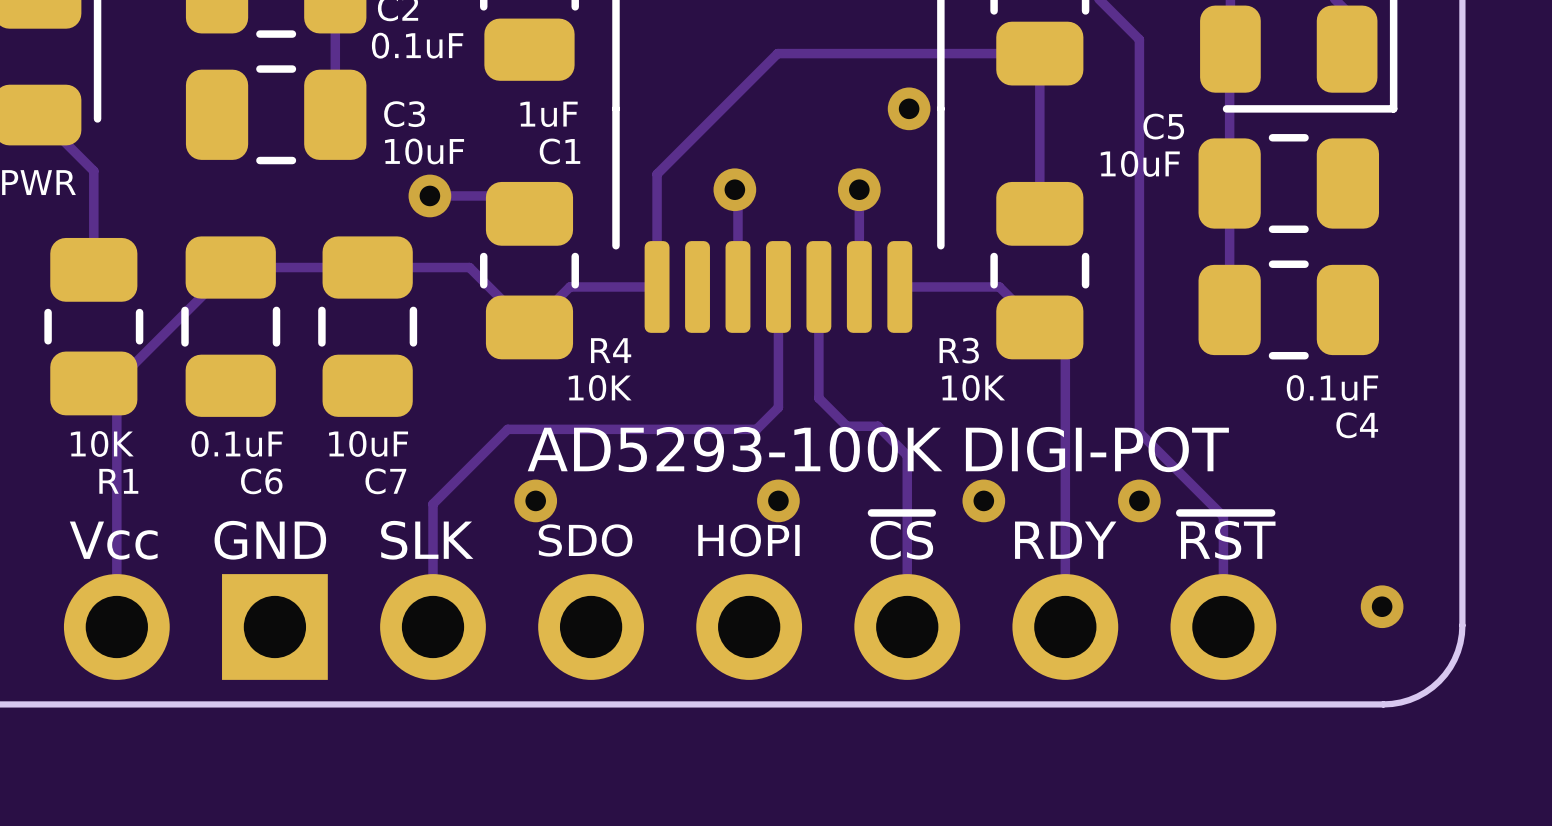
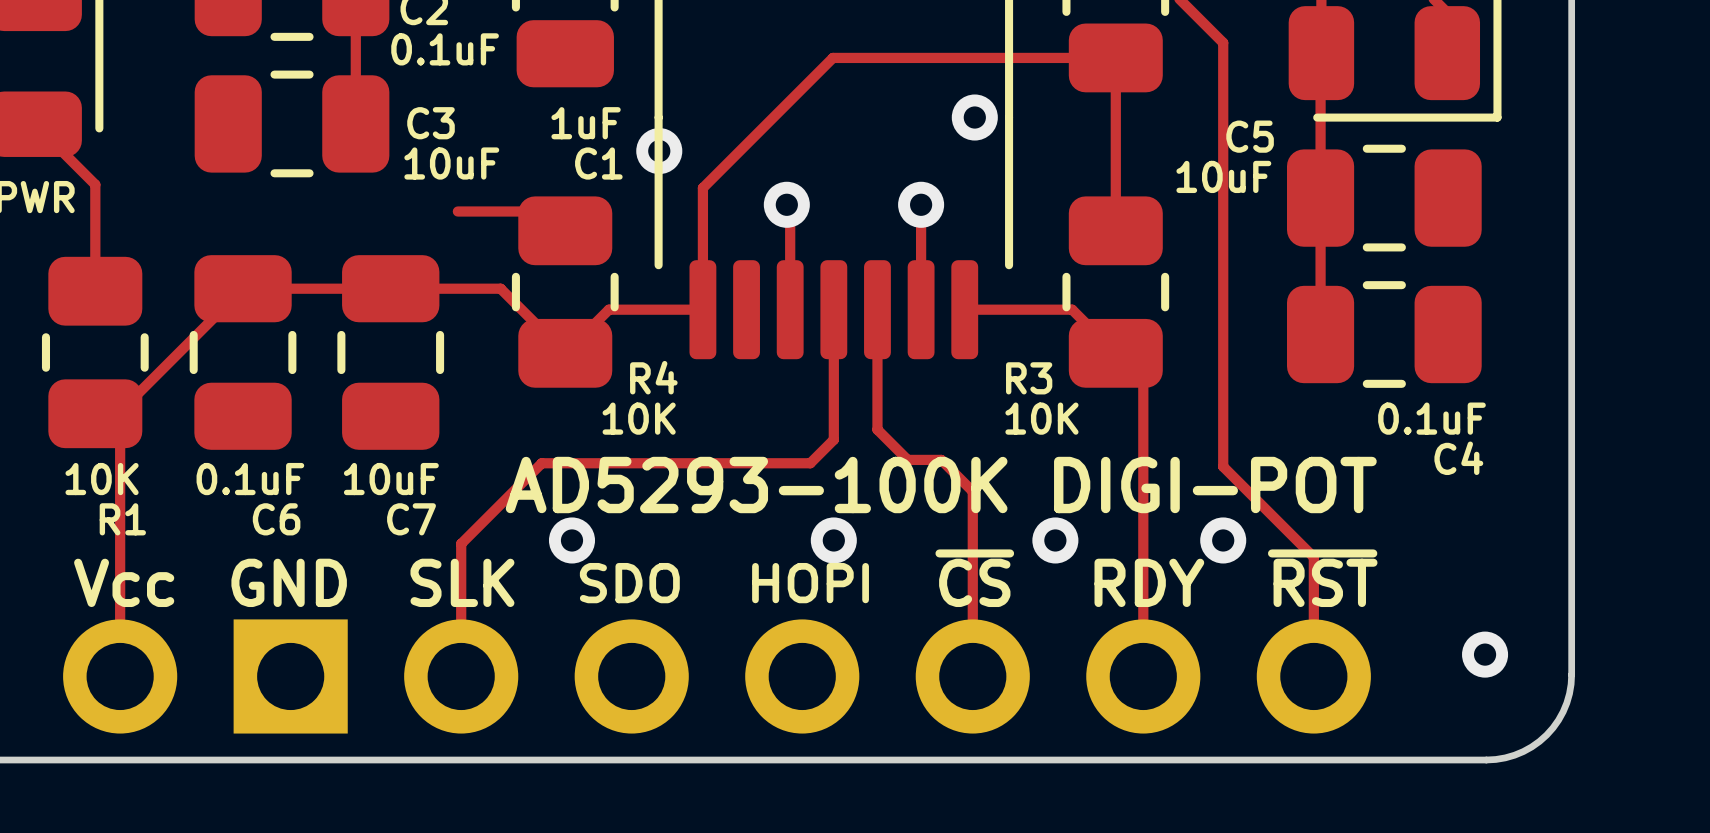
via: none -> (659, 151)
via: (429, 195) -> none

